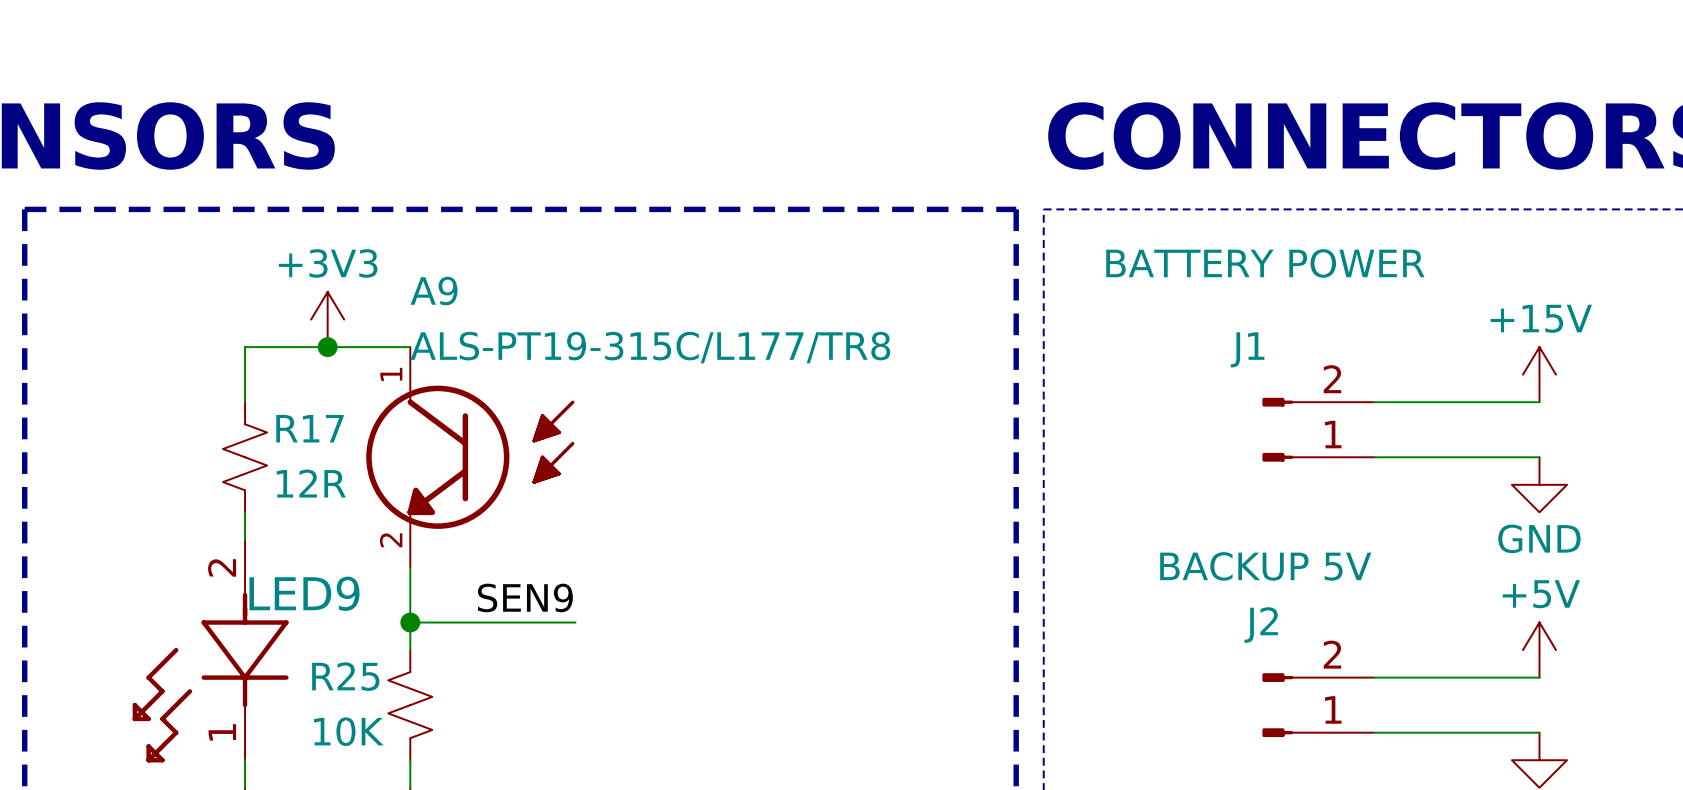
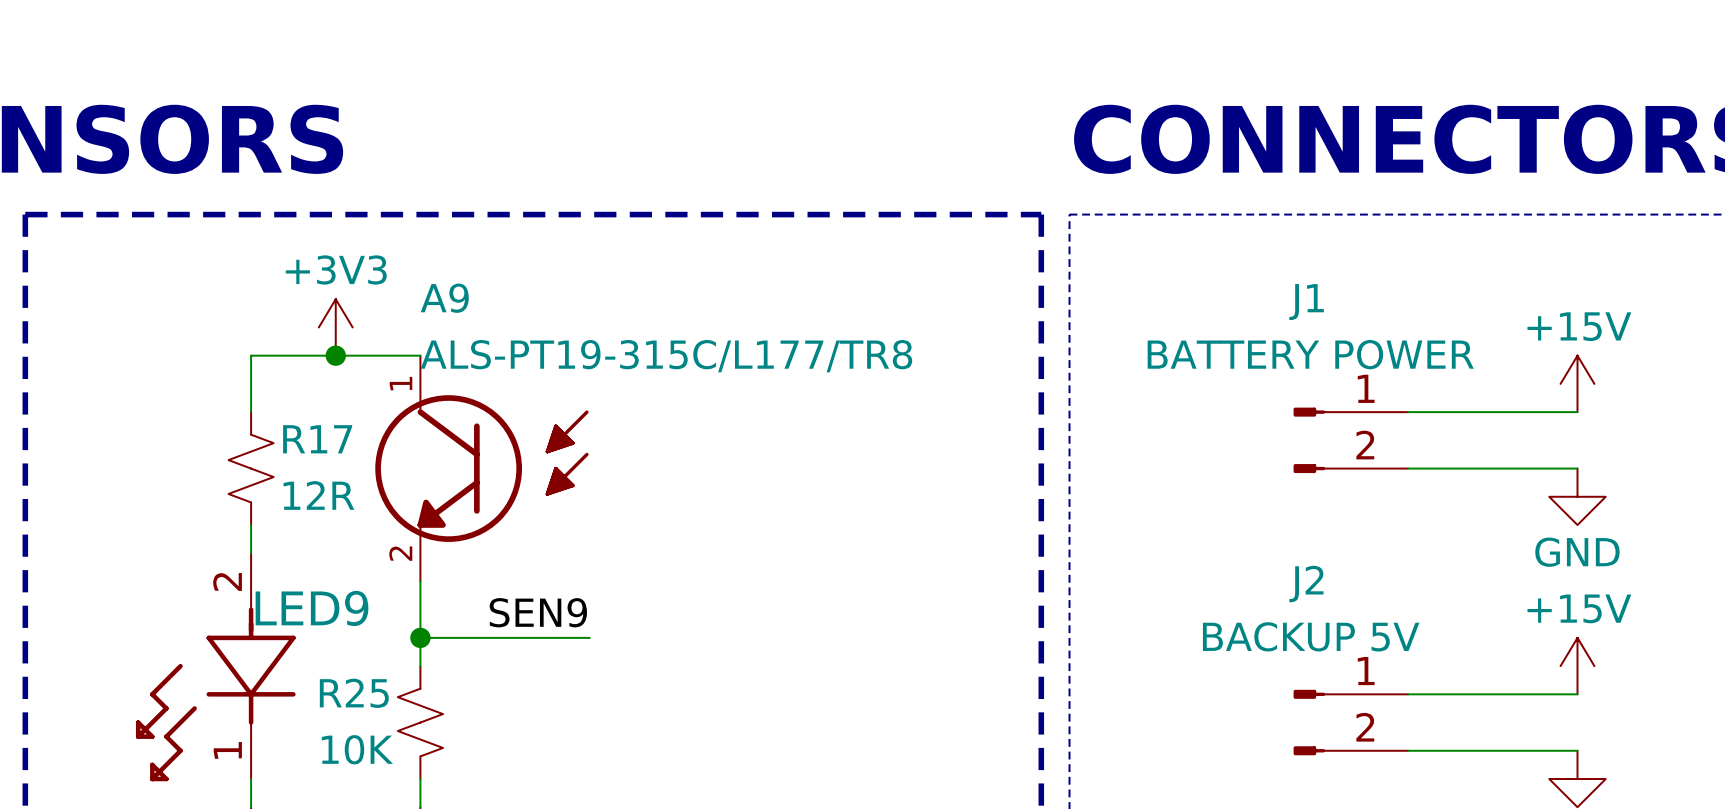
J1 value position: BATTERY POWER (1265, 263) -> BATTERY POWER (1310, 354)
J1 name position: J1 (1247, 349) -> J1 (1306, 302)
J1 flip: as is (1277, 429) -> up-down (1309, 440)
J2 value position: BACKUP 5V (1265, 566) -> BACKUP 5V (1311, 636)
J2 name position: J2 (1261, 625) -> J2 (1306, 584)
power symbol: +5V (1539, 650) -> +15V (1577, 666)
J2 flip: as is (1277, 705) -> up-down (1309, 722)

